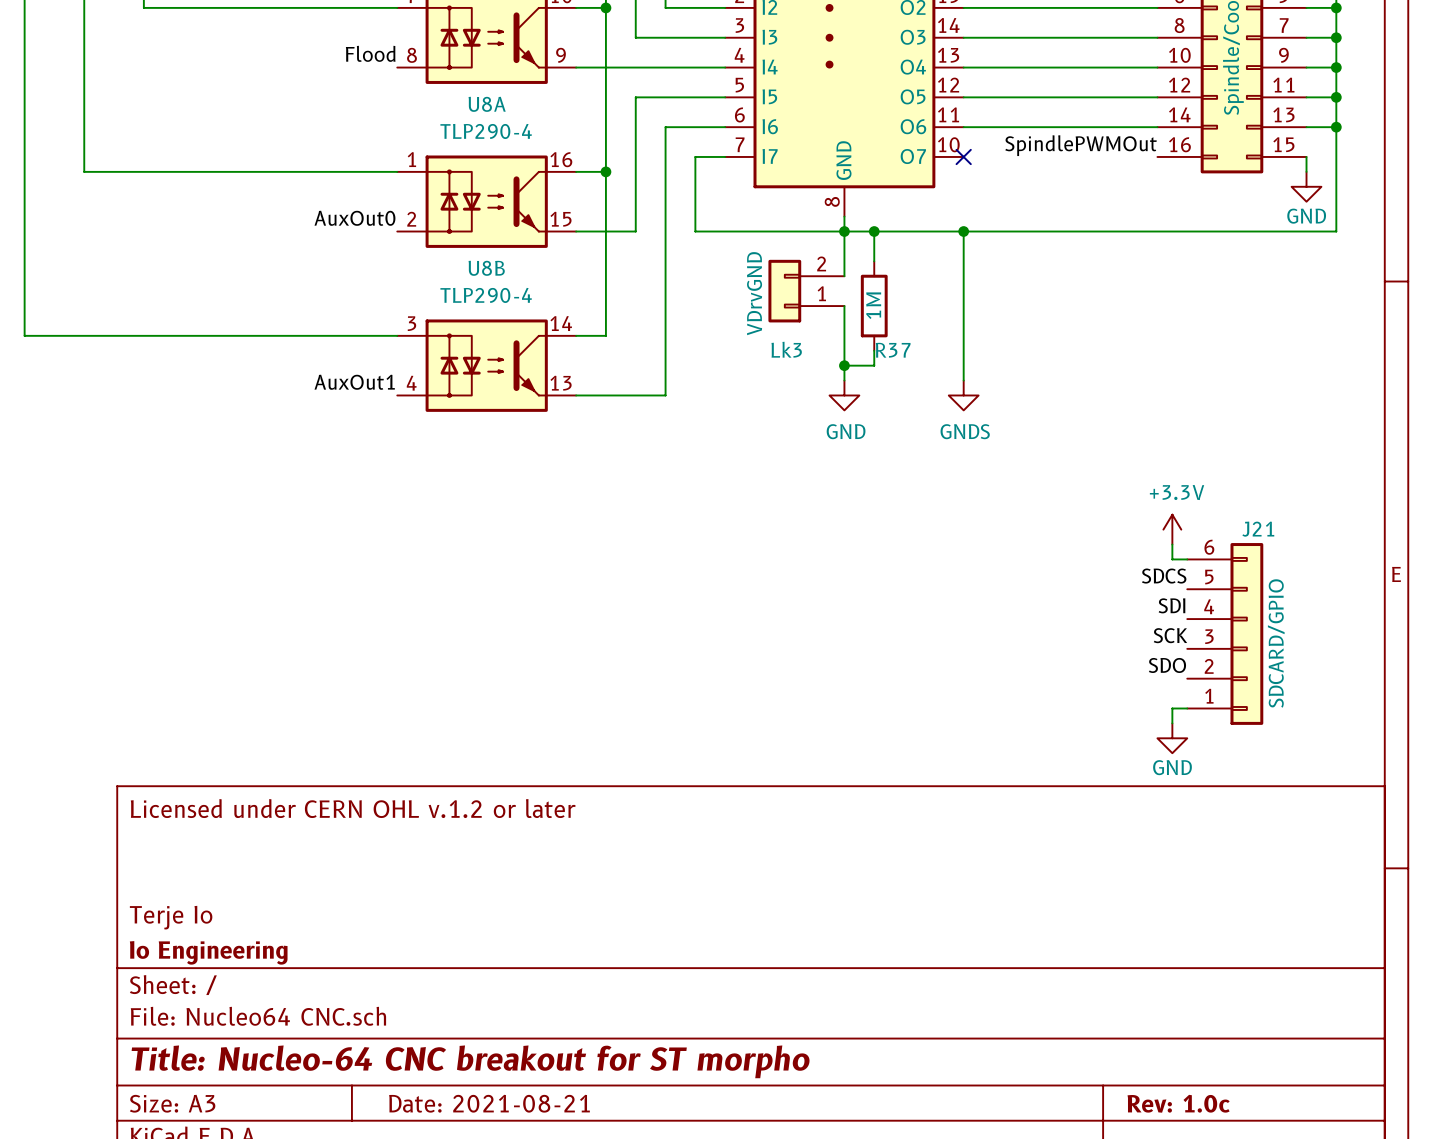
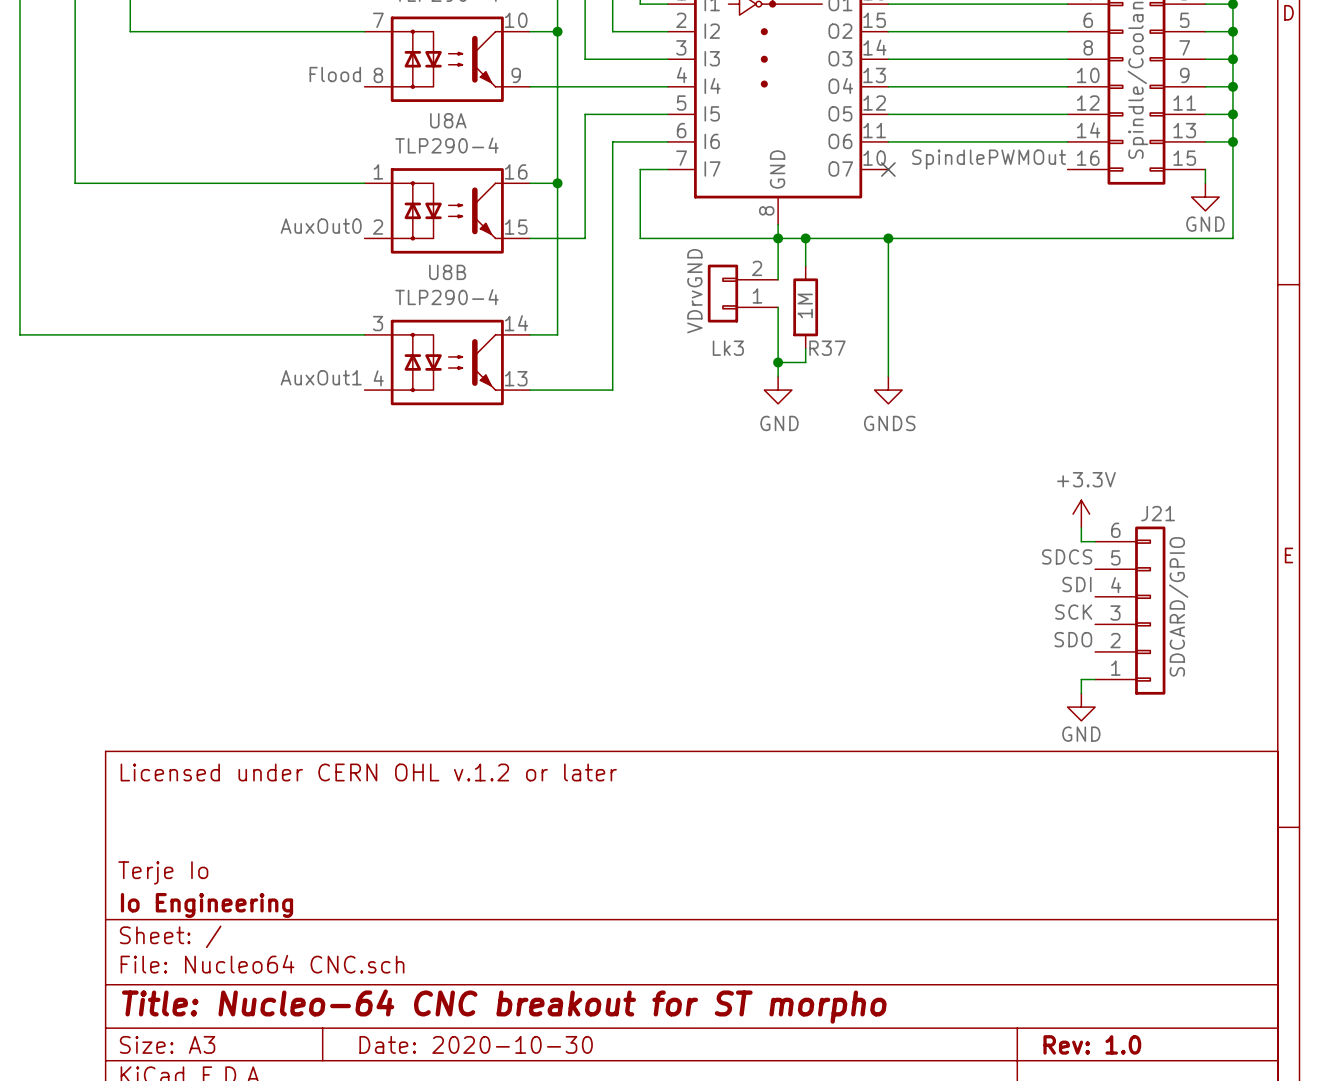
title block: Date: 2021-08-21 (489, 1103) -> Date: 2020-10-30 (476, 1044)
title block: Rev: 1.0c (1178, 1103) -> Rev: 1.0 (1092, 1044)

